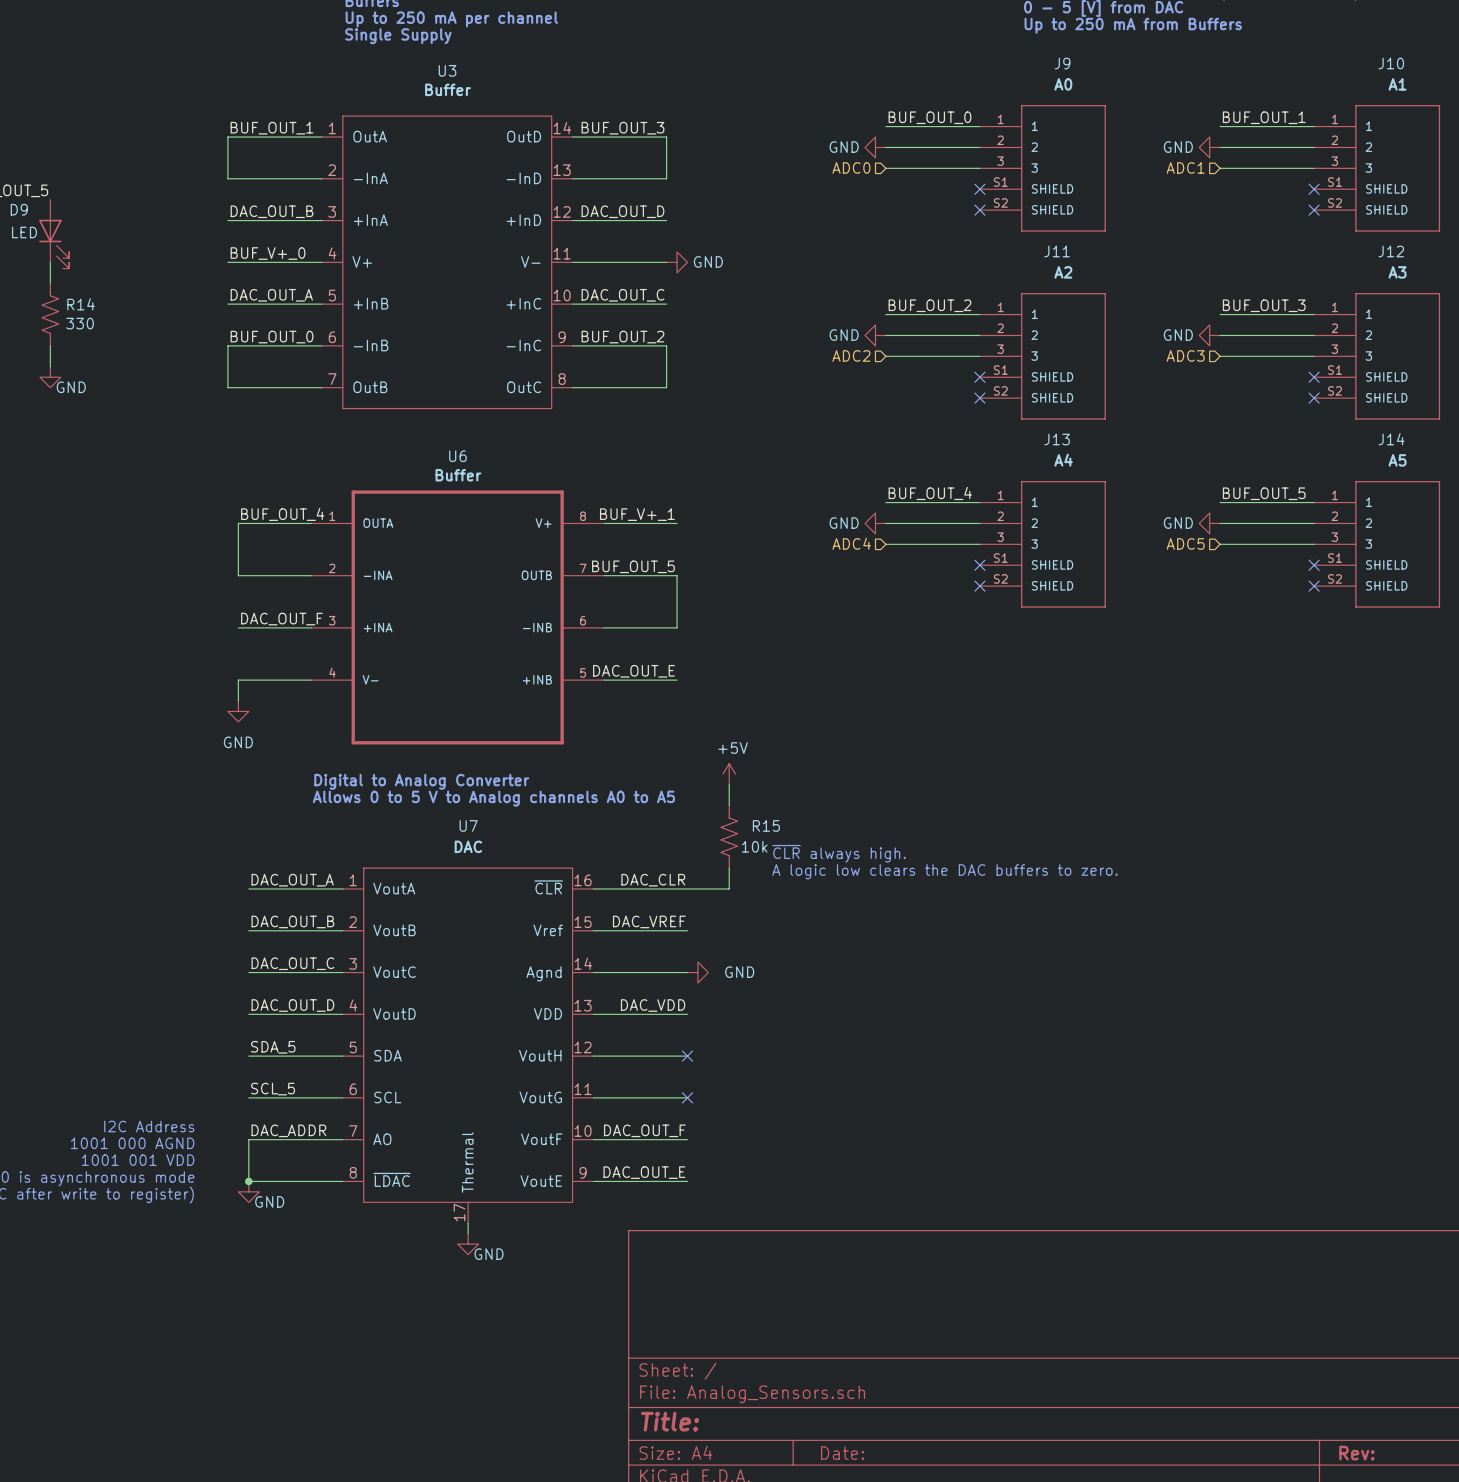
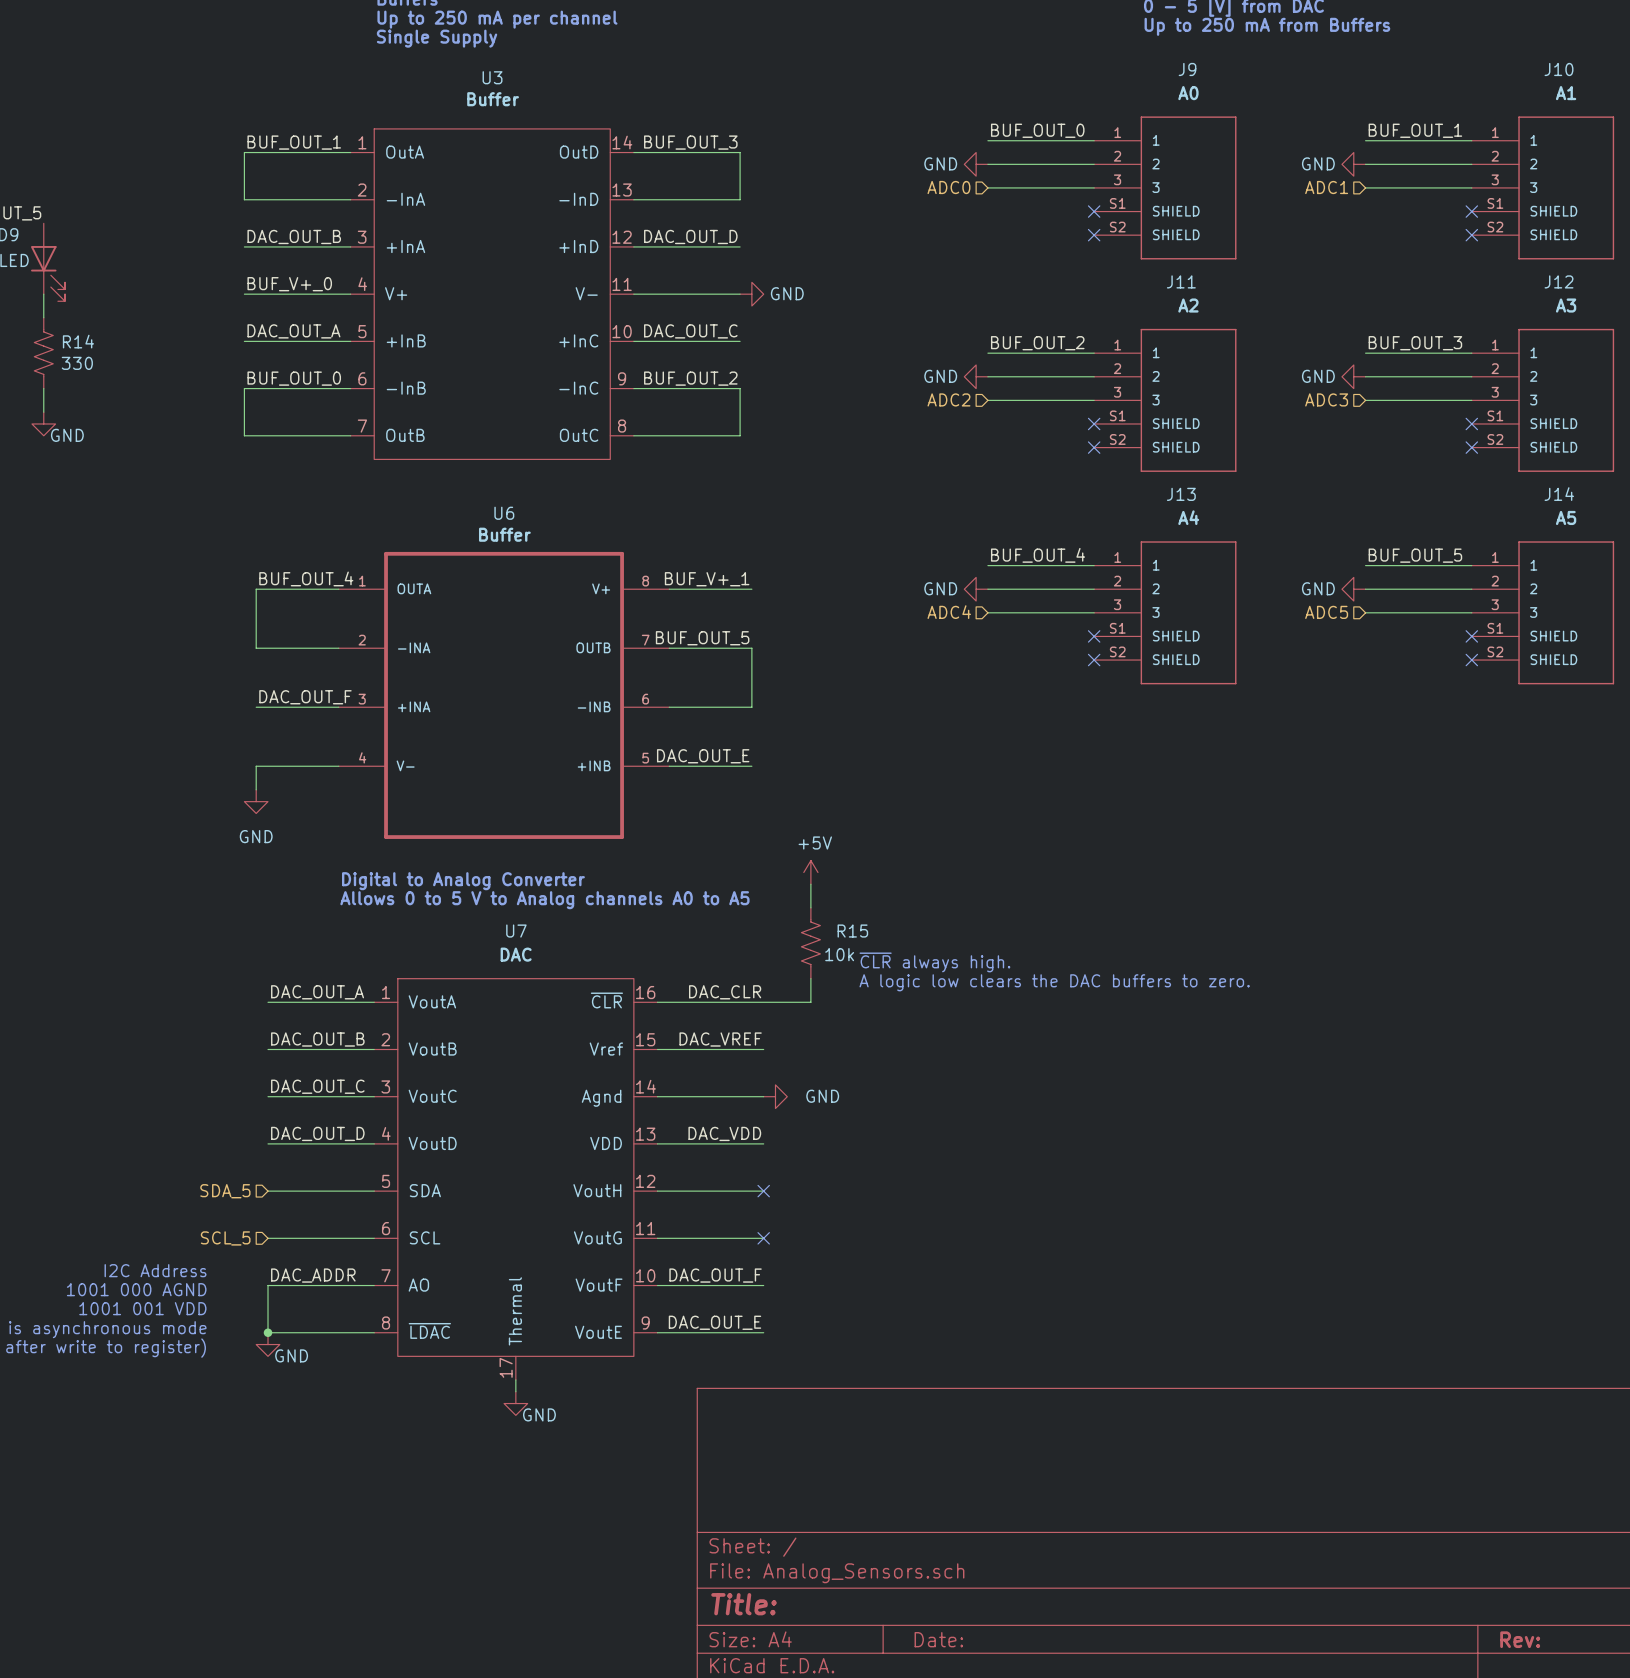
label: SDA_5 (273, 1047) -> none
hierarchical label: none -> SDA_5 (225, 1191)
label: SCL_5 (273, 1089) -> none
hierarchical label: none -> SCL_5 (225, 1238)

